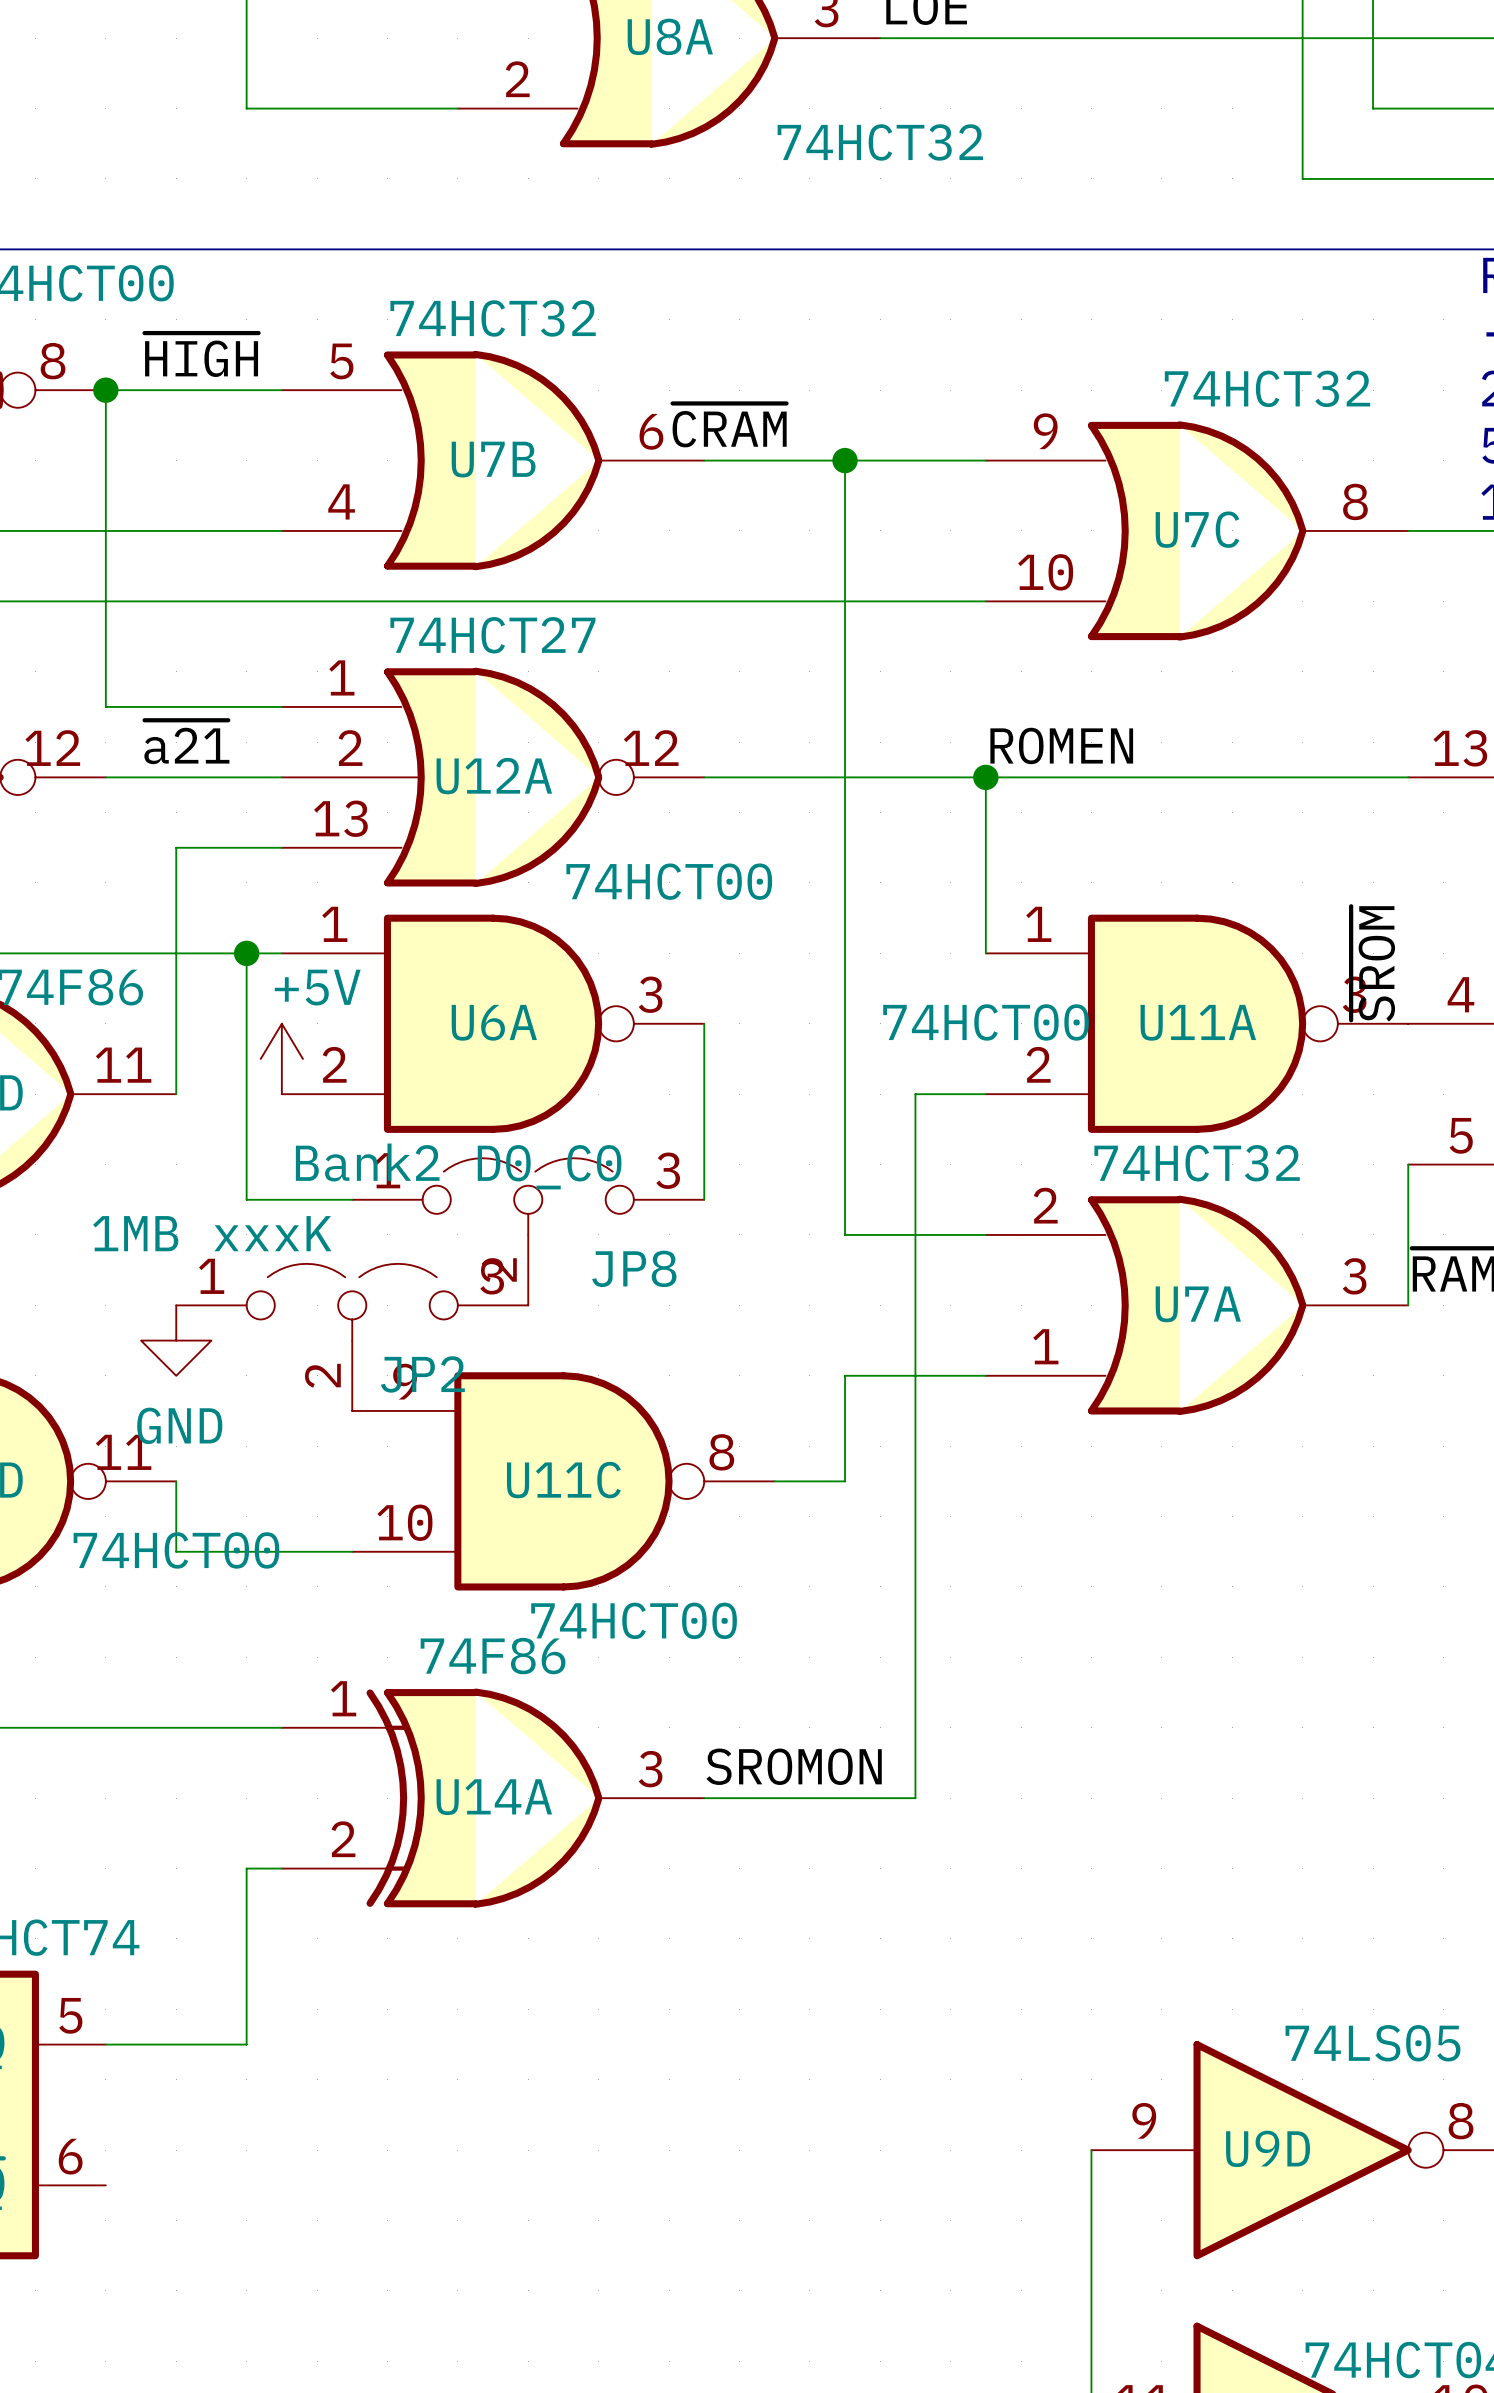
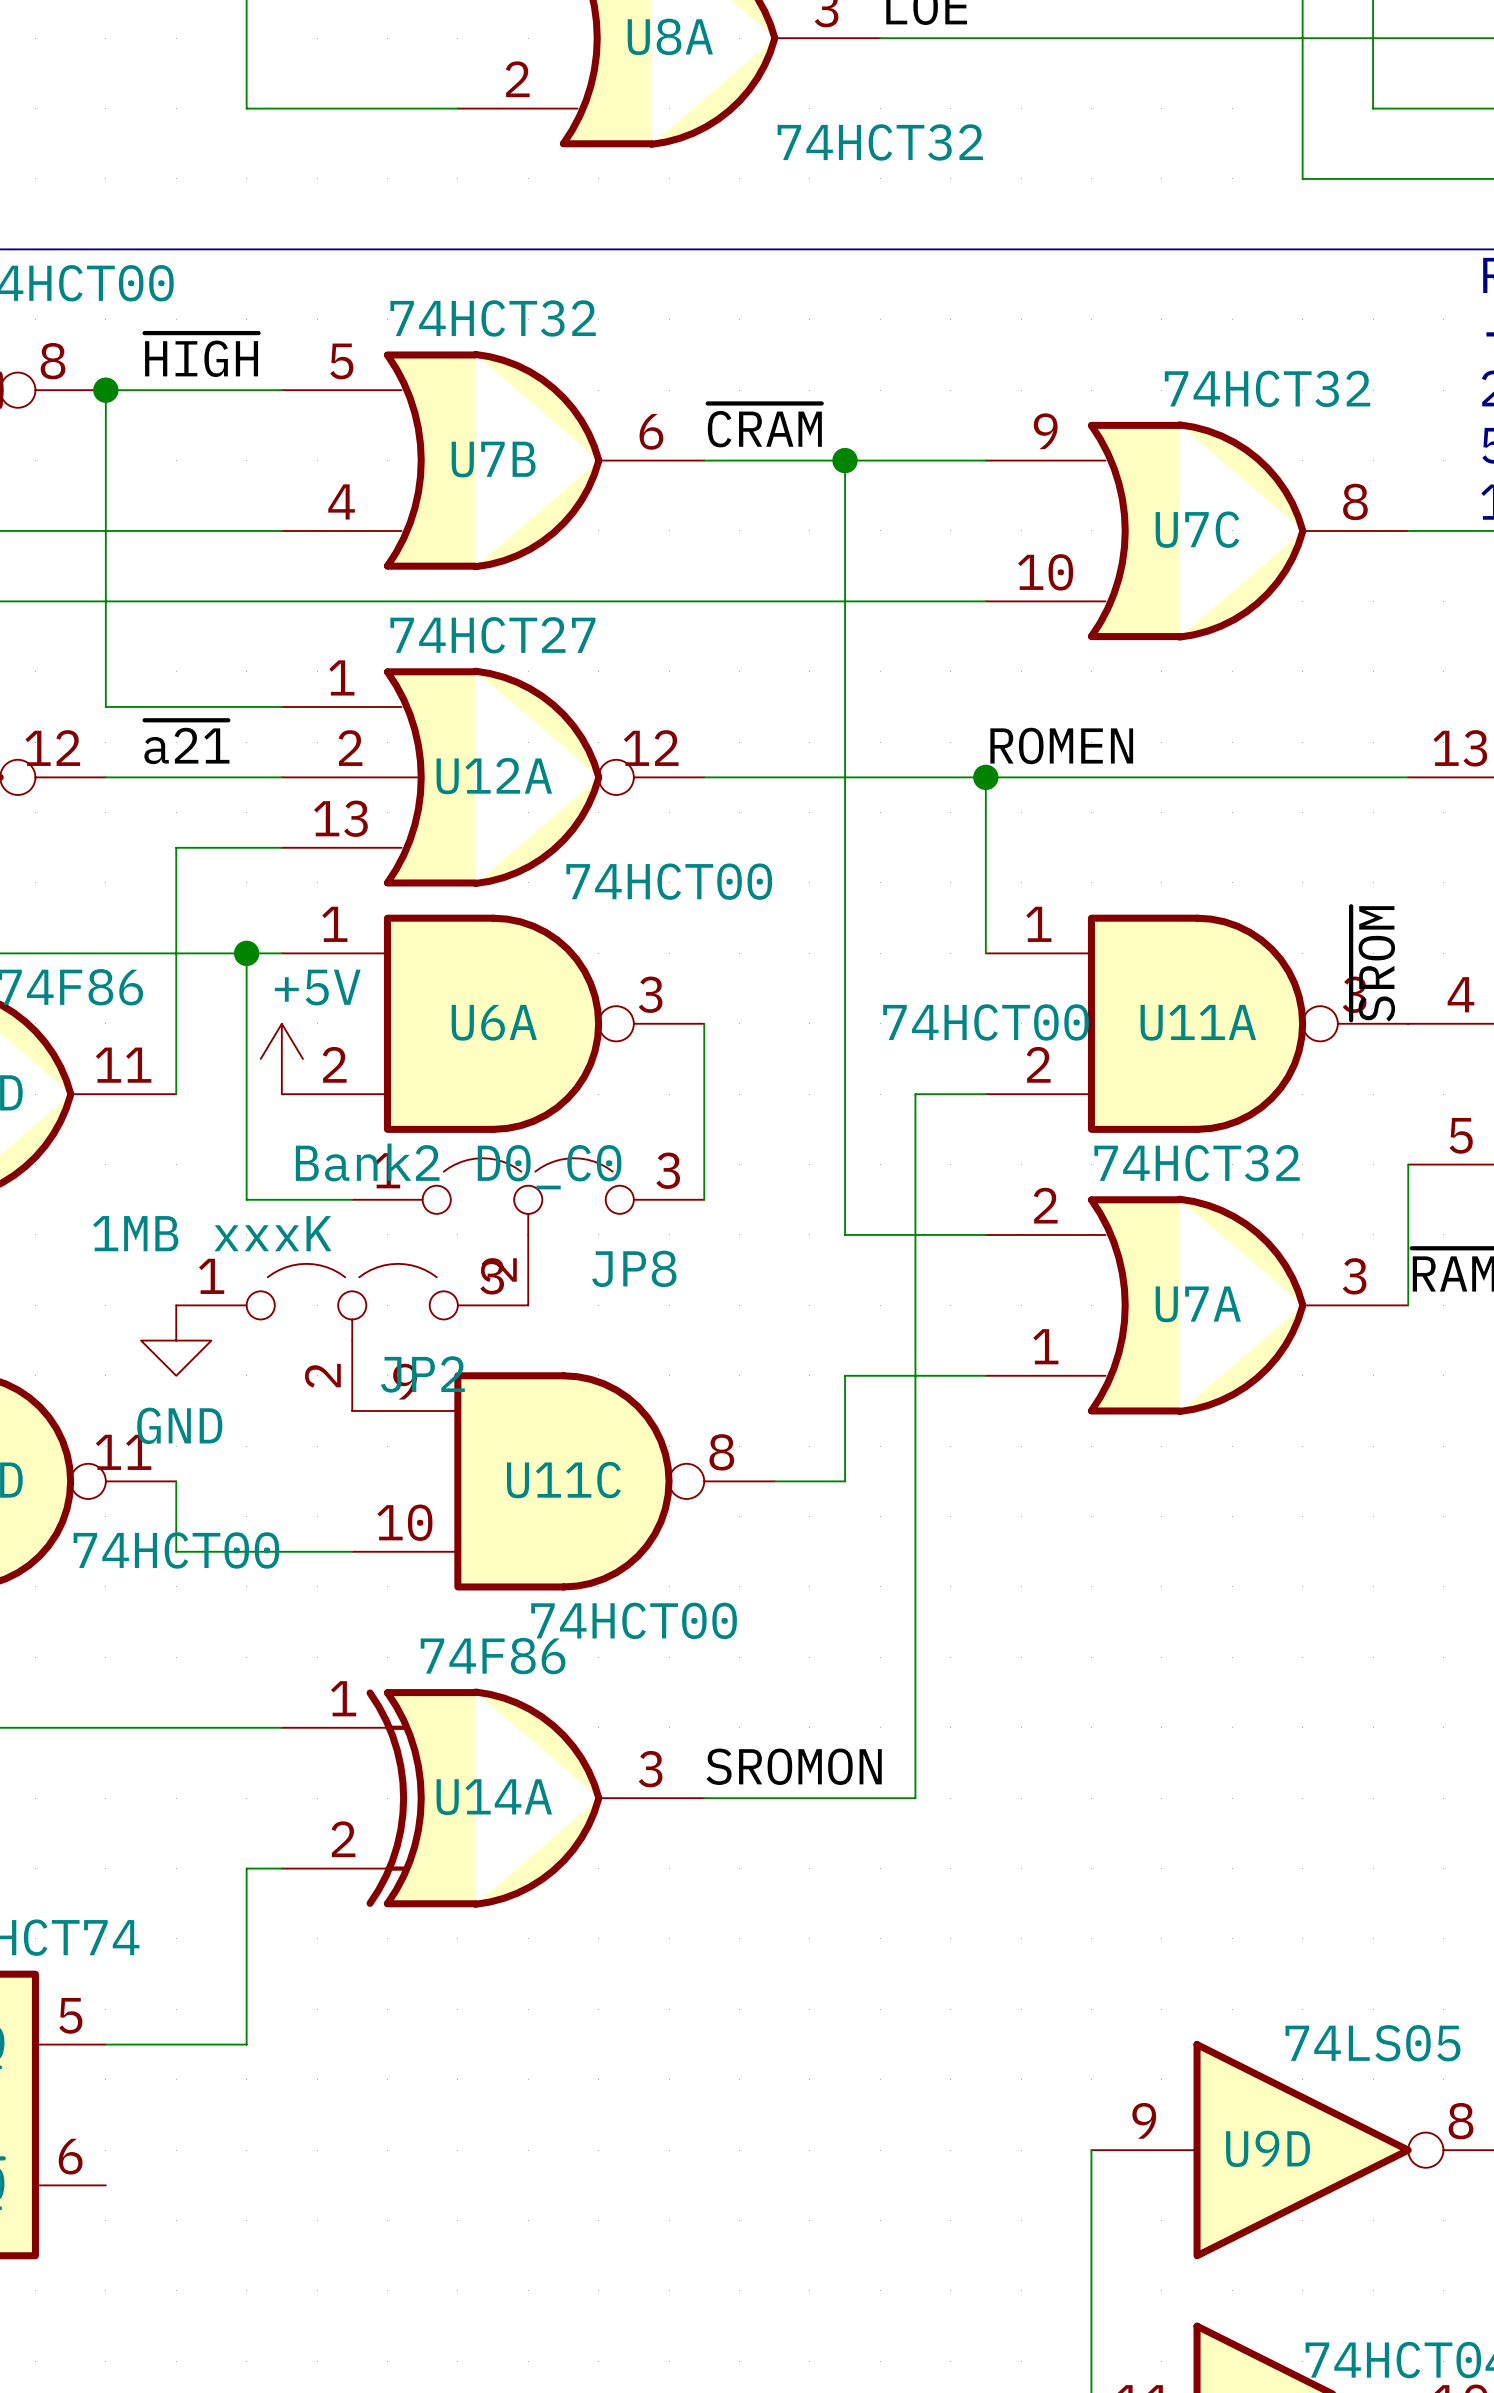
label position: ~{CRAM} (729, 425) -> ~{CRAM} (764, 425)

